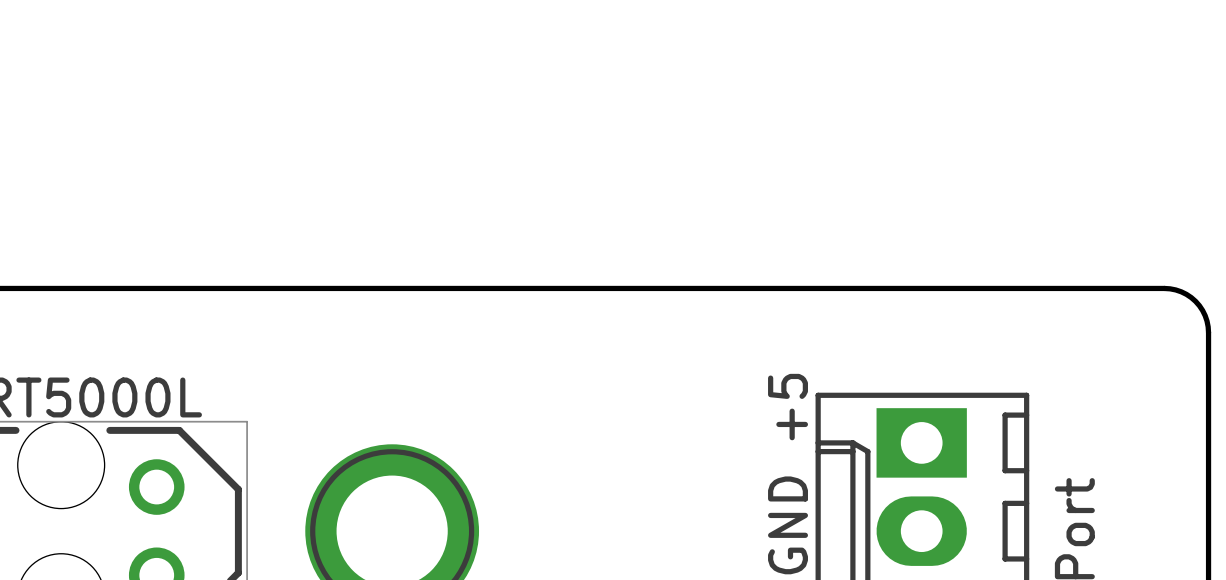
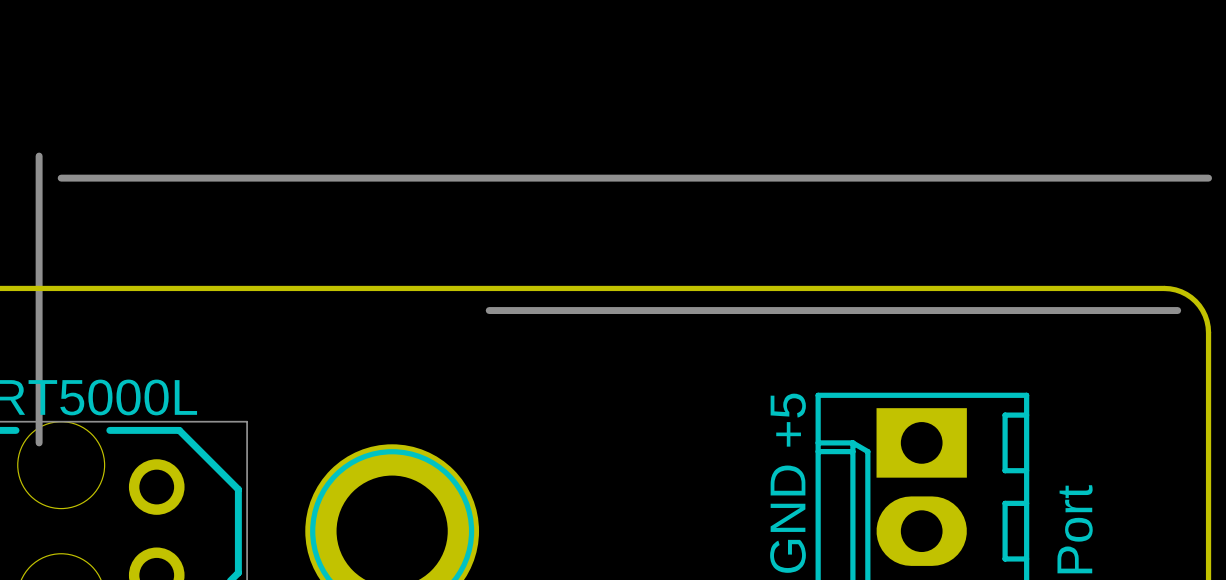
line: none -> (39, 156) (39, 442)
line: none -> (61, 178) (1208, 178)
line: none -> (489, 310) (1177, 310)

